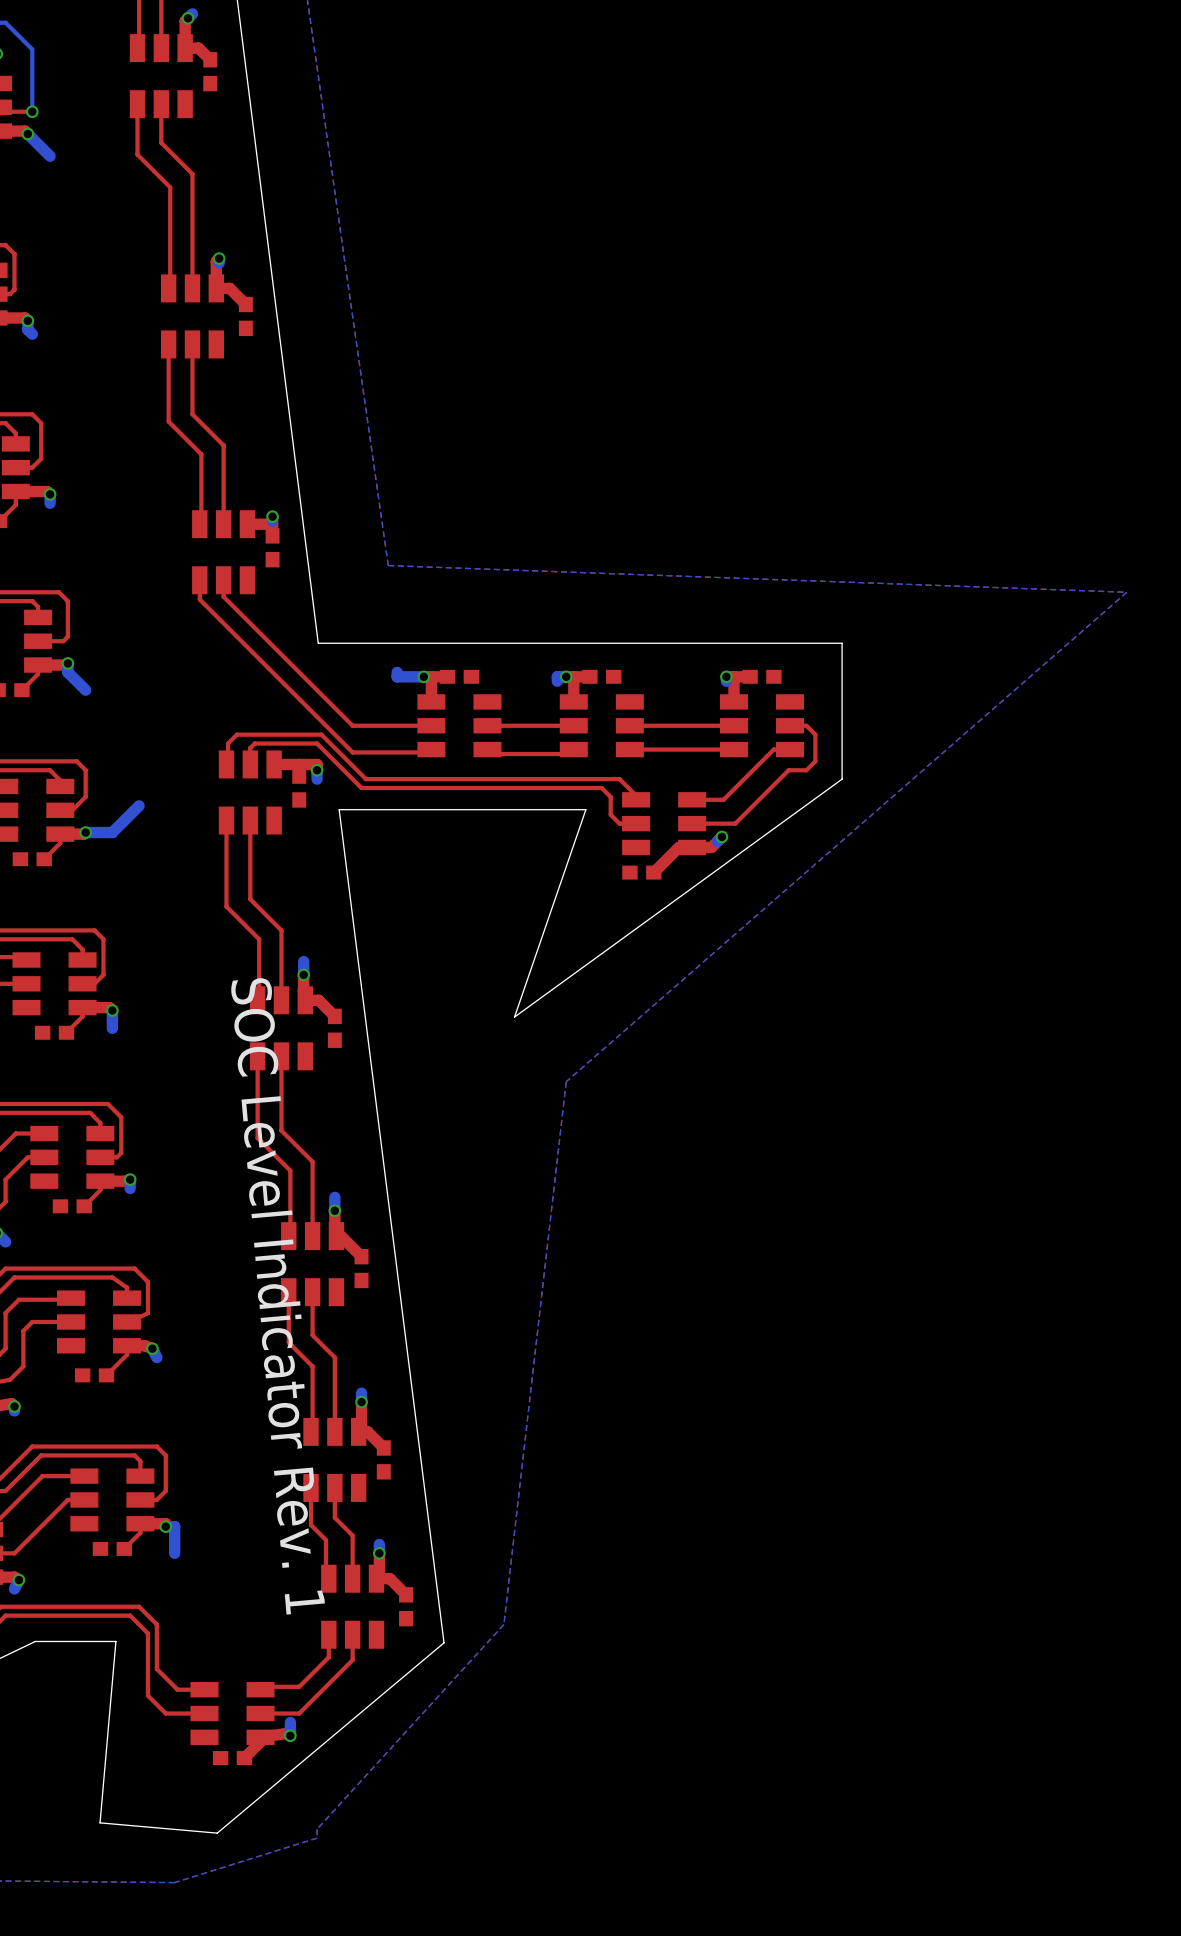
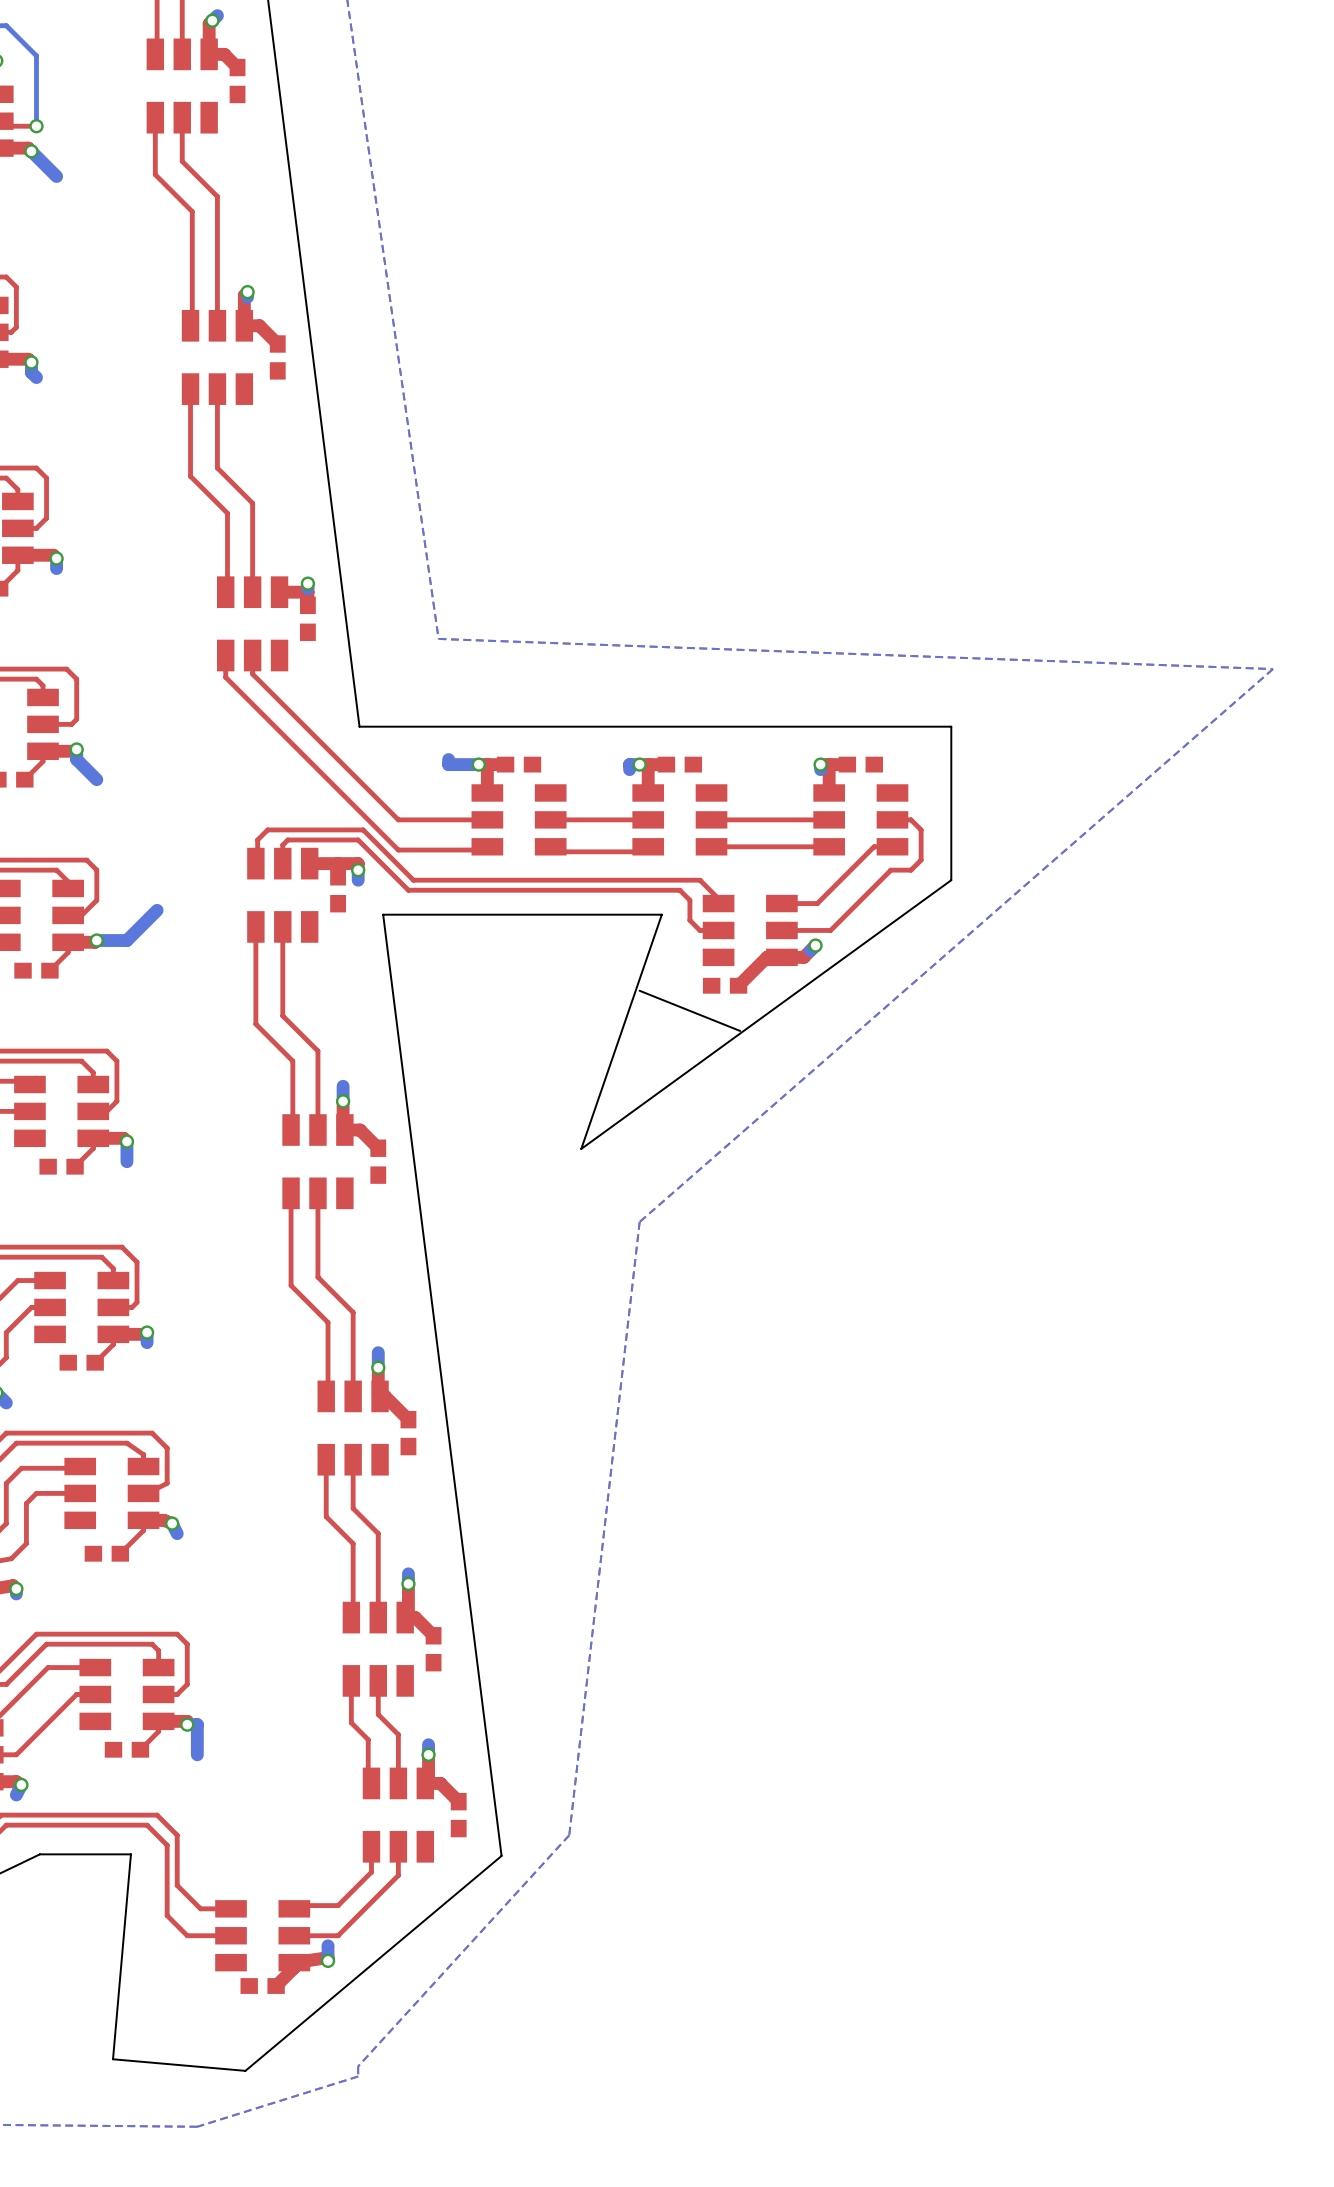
board edge: none -> (639, 990) (740, 1030)
text: SOC Level Indicator Rev. 1 (278, 1296) -> none

